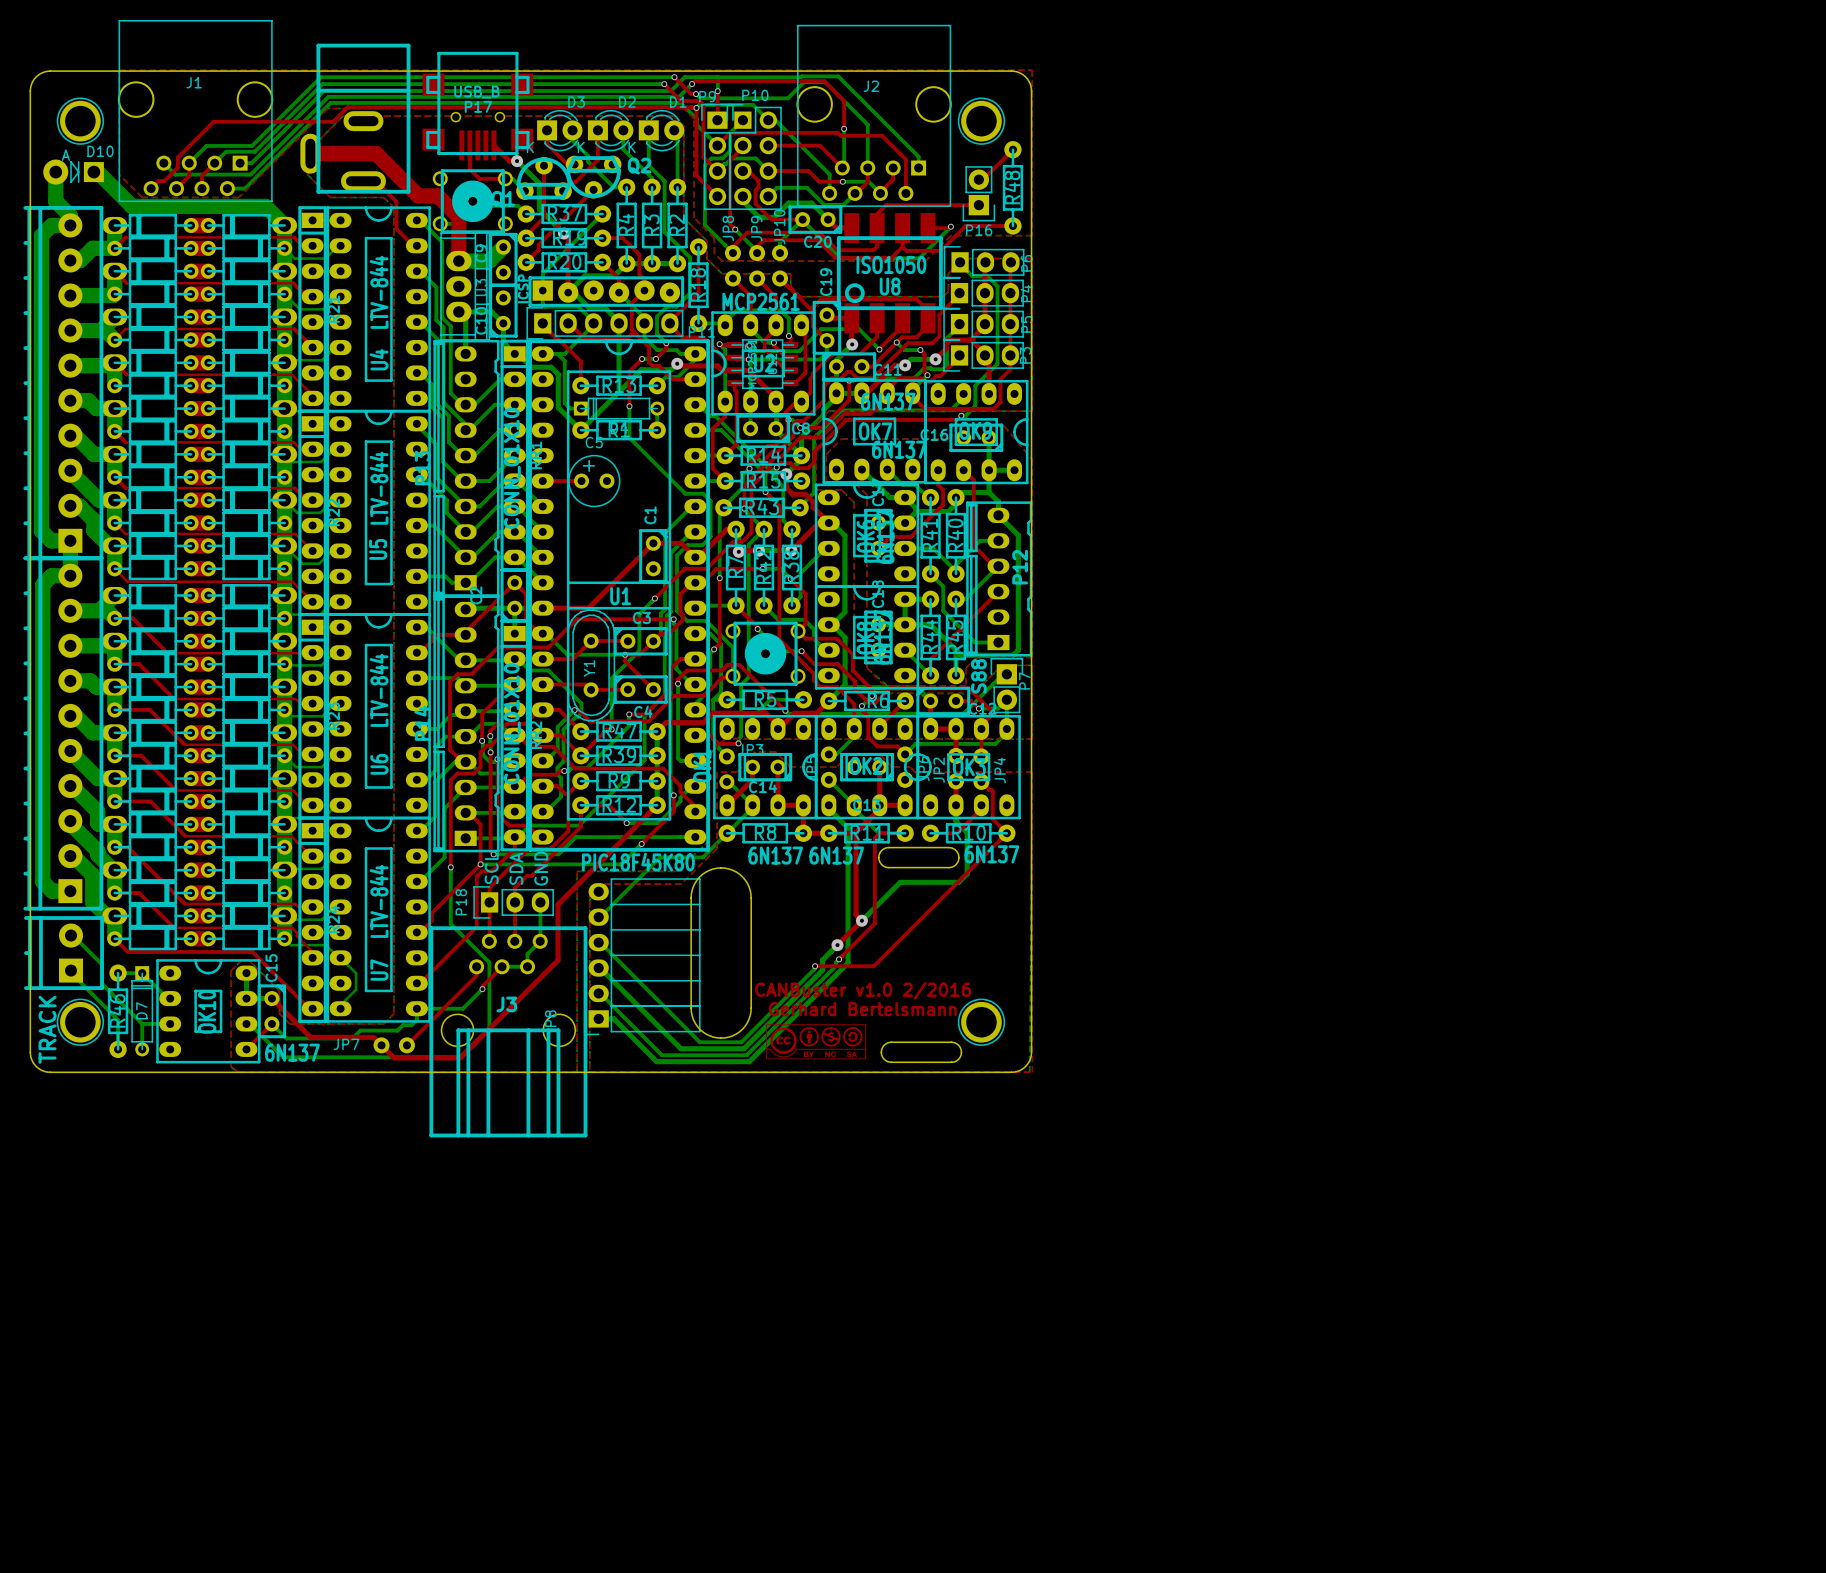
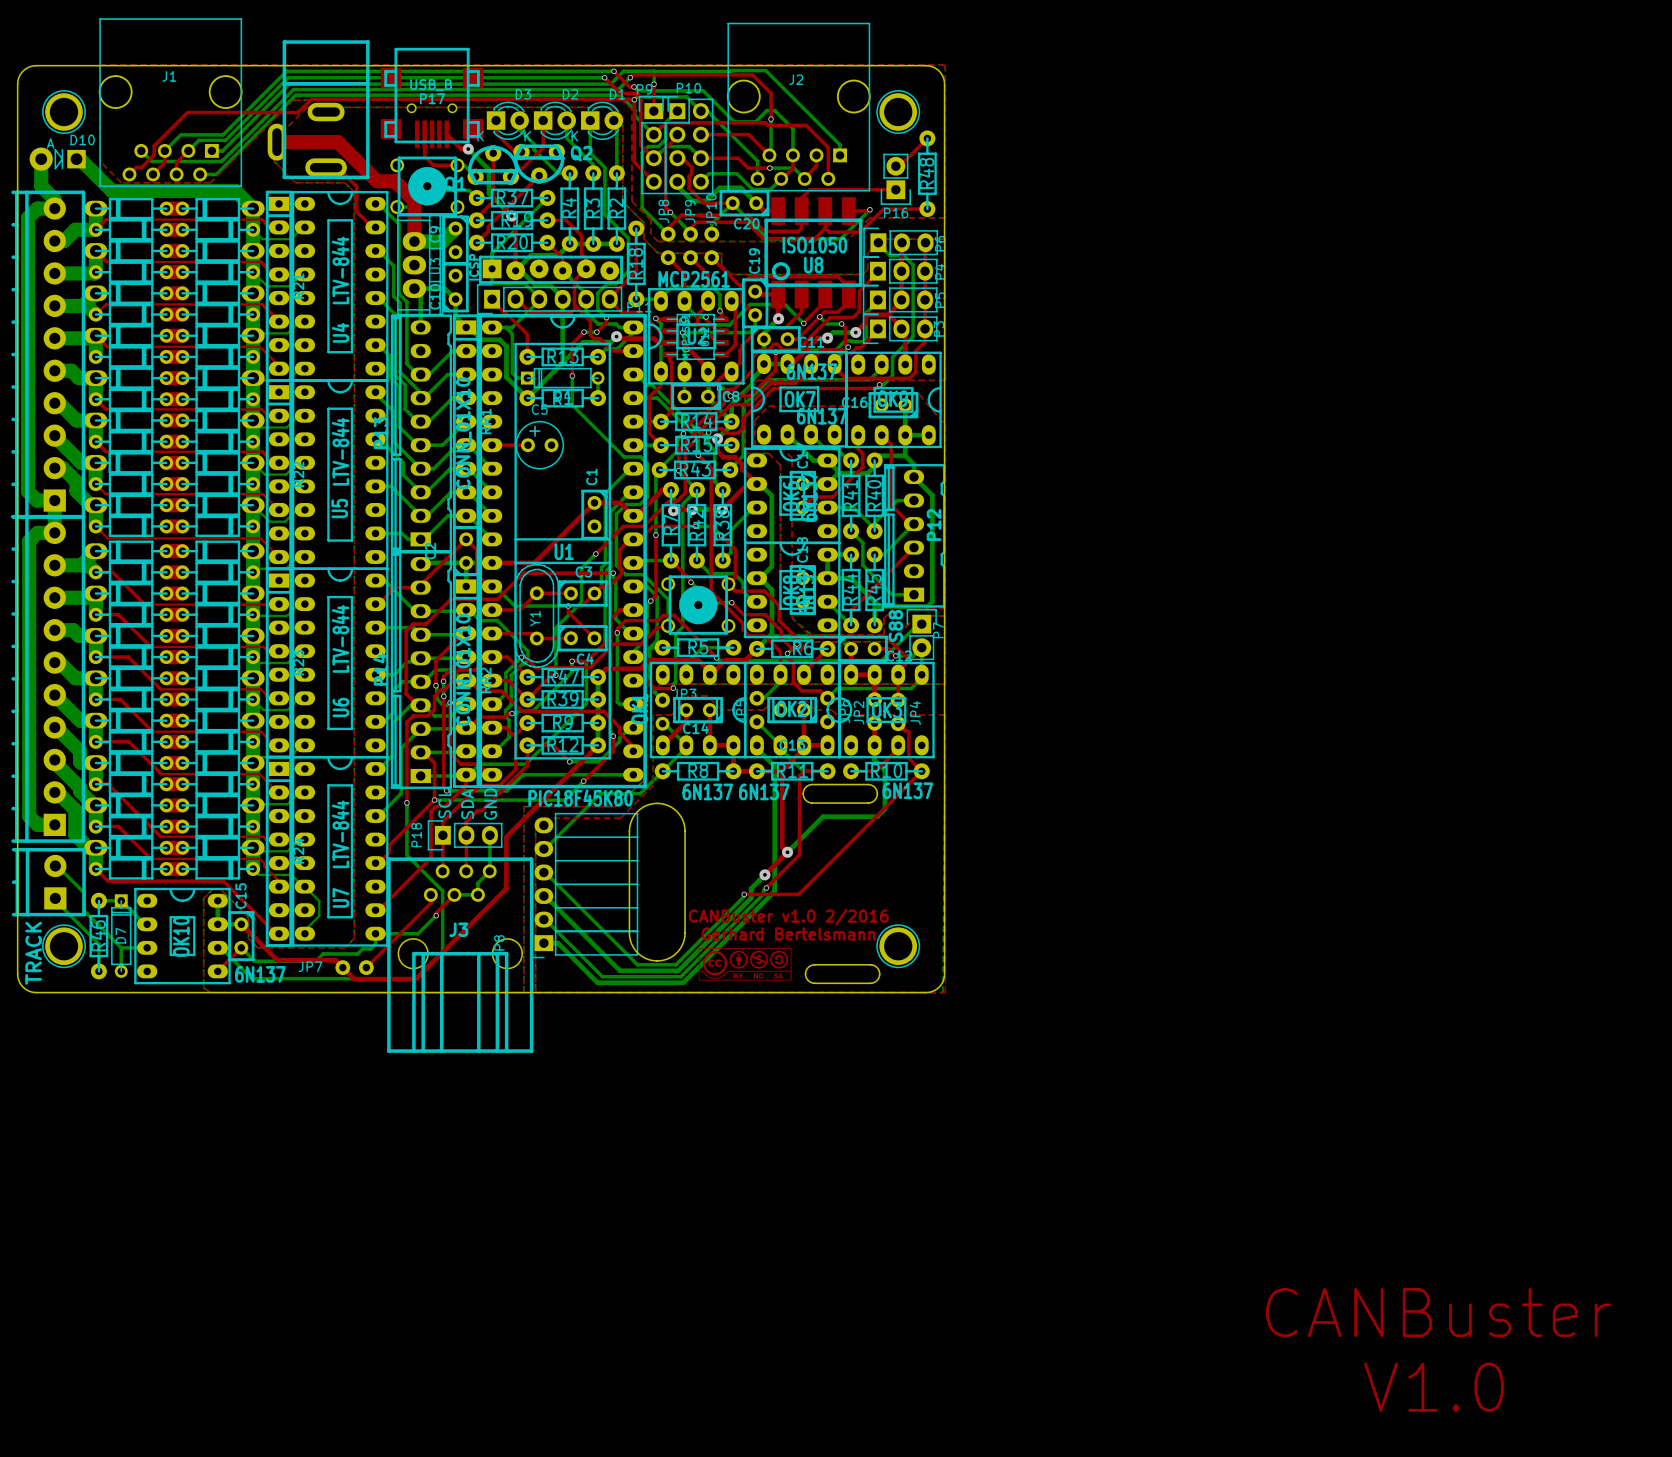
bottom track: (770, 98) (787, 98) (804, 82) (825, 82) (867, 124) (867, 139) -> (703, 90) (734, 121) (755, 121) (766, 110) (774, 110) (792, 128)
text: none -> CANBuster (1438, 1312)
text: none -> V1.0 (1433, 1387)

